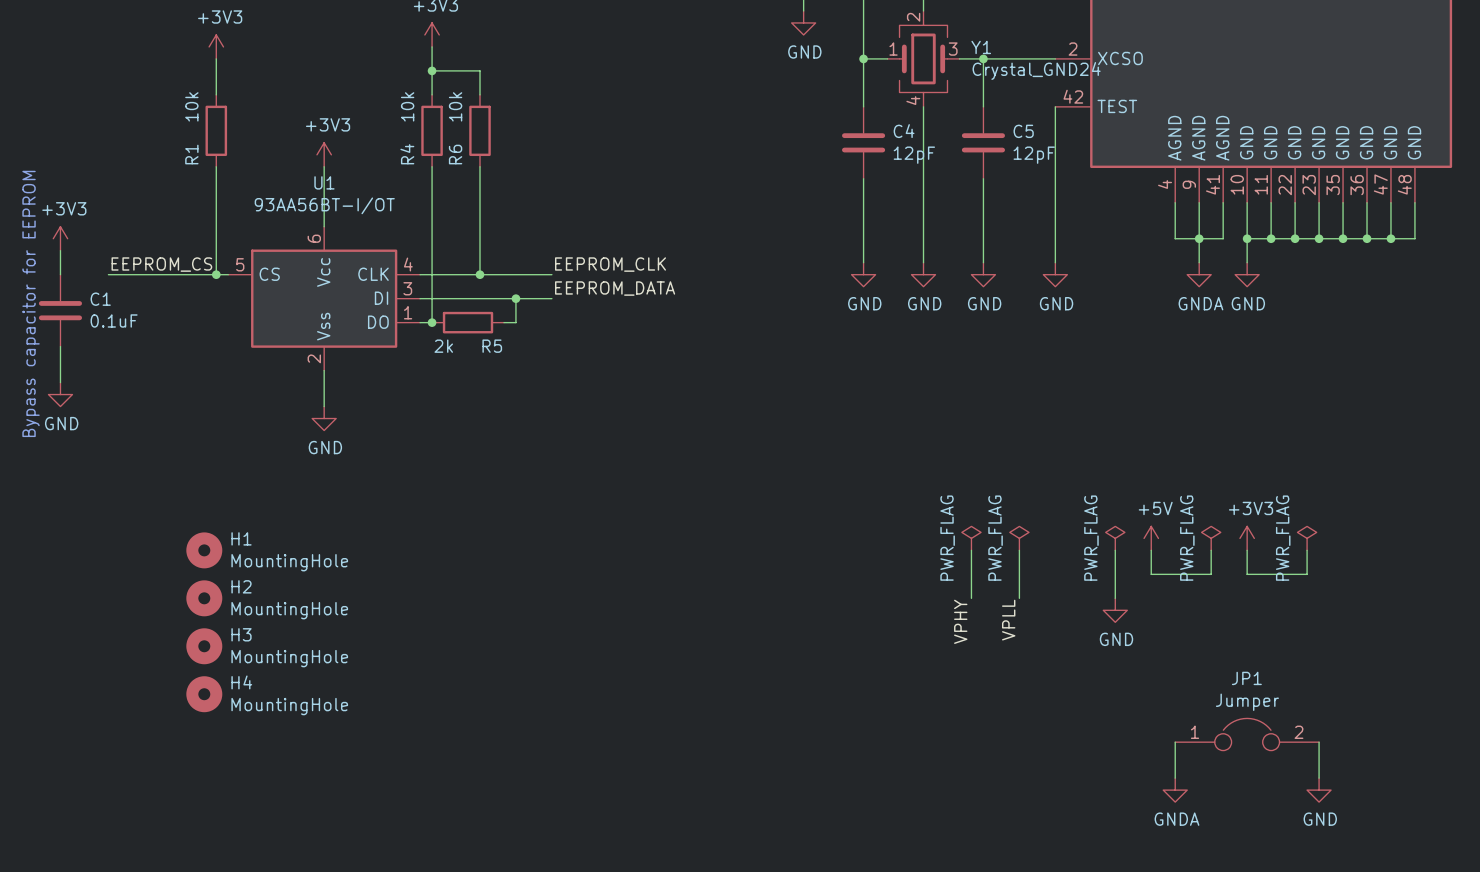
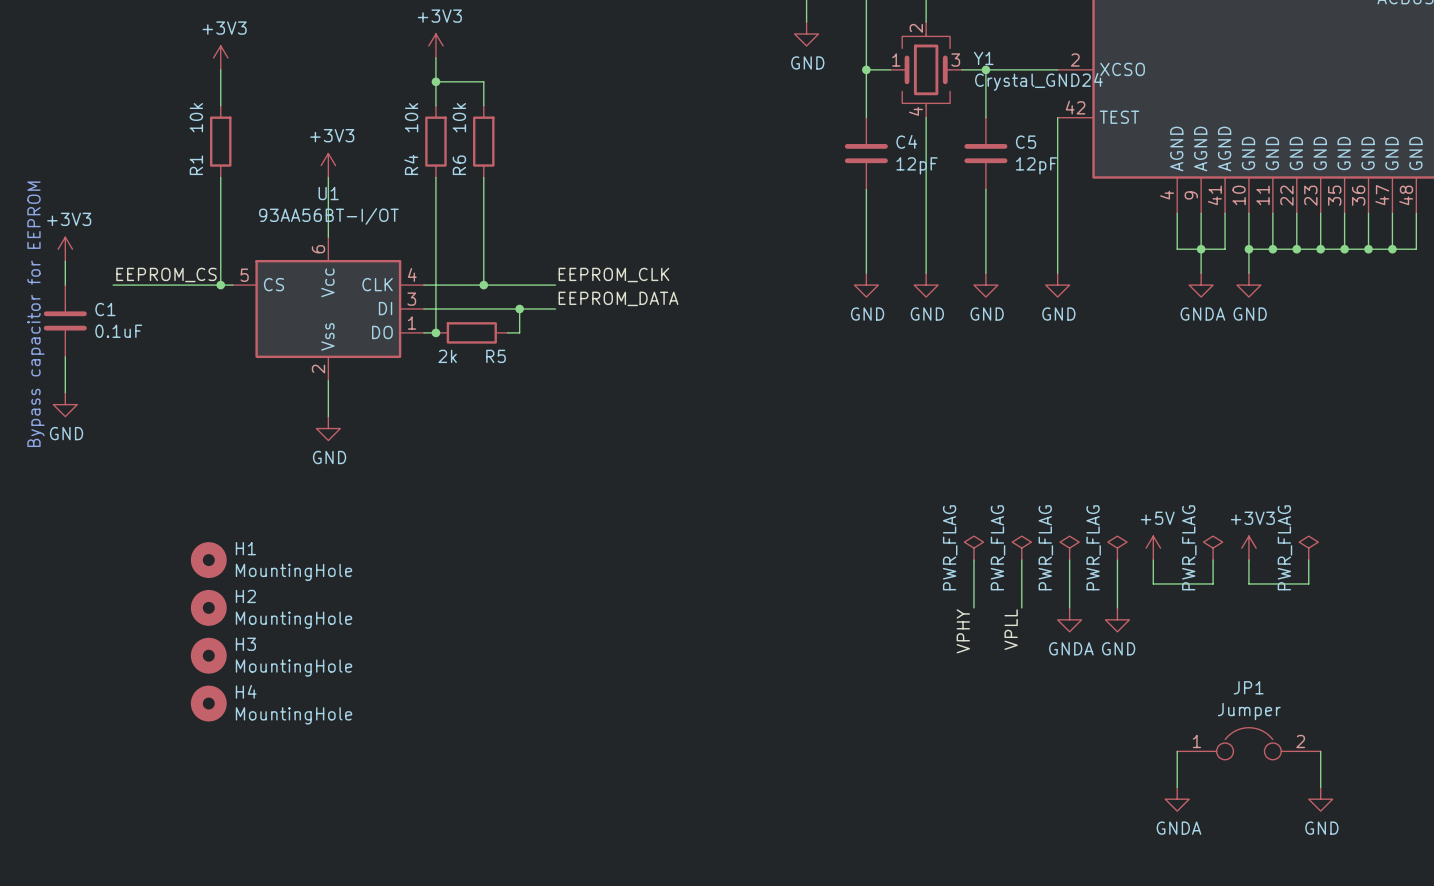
power symbol: none -> PWR_FLAG (1069, 548)
wire: none -> (1069, 560) (1069, 607)
power symbol: none -> GNDA (1069, 619)

